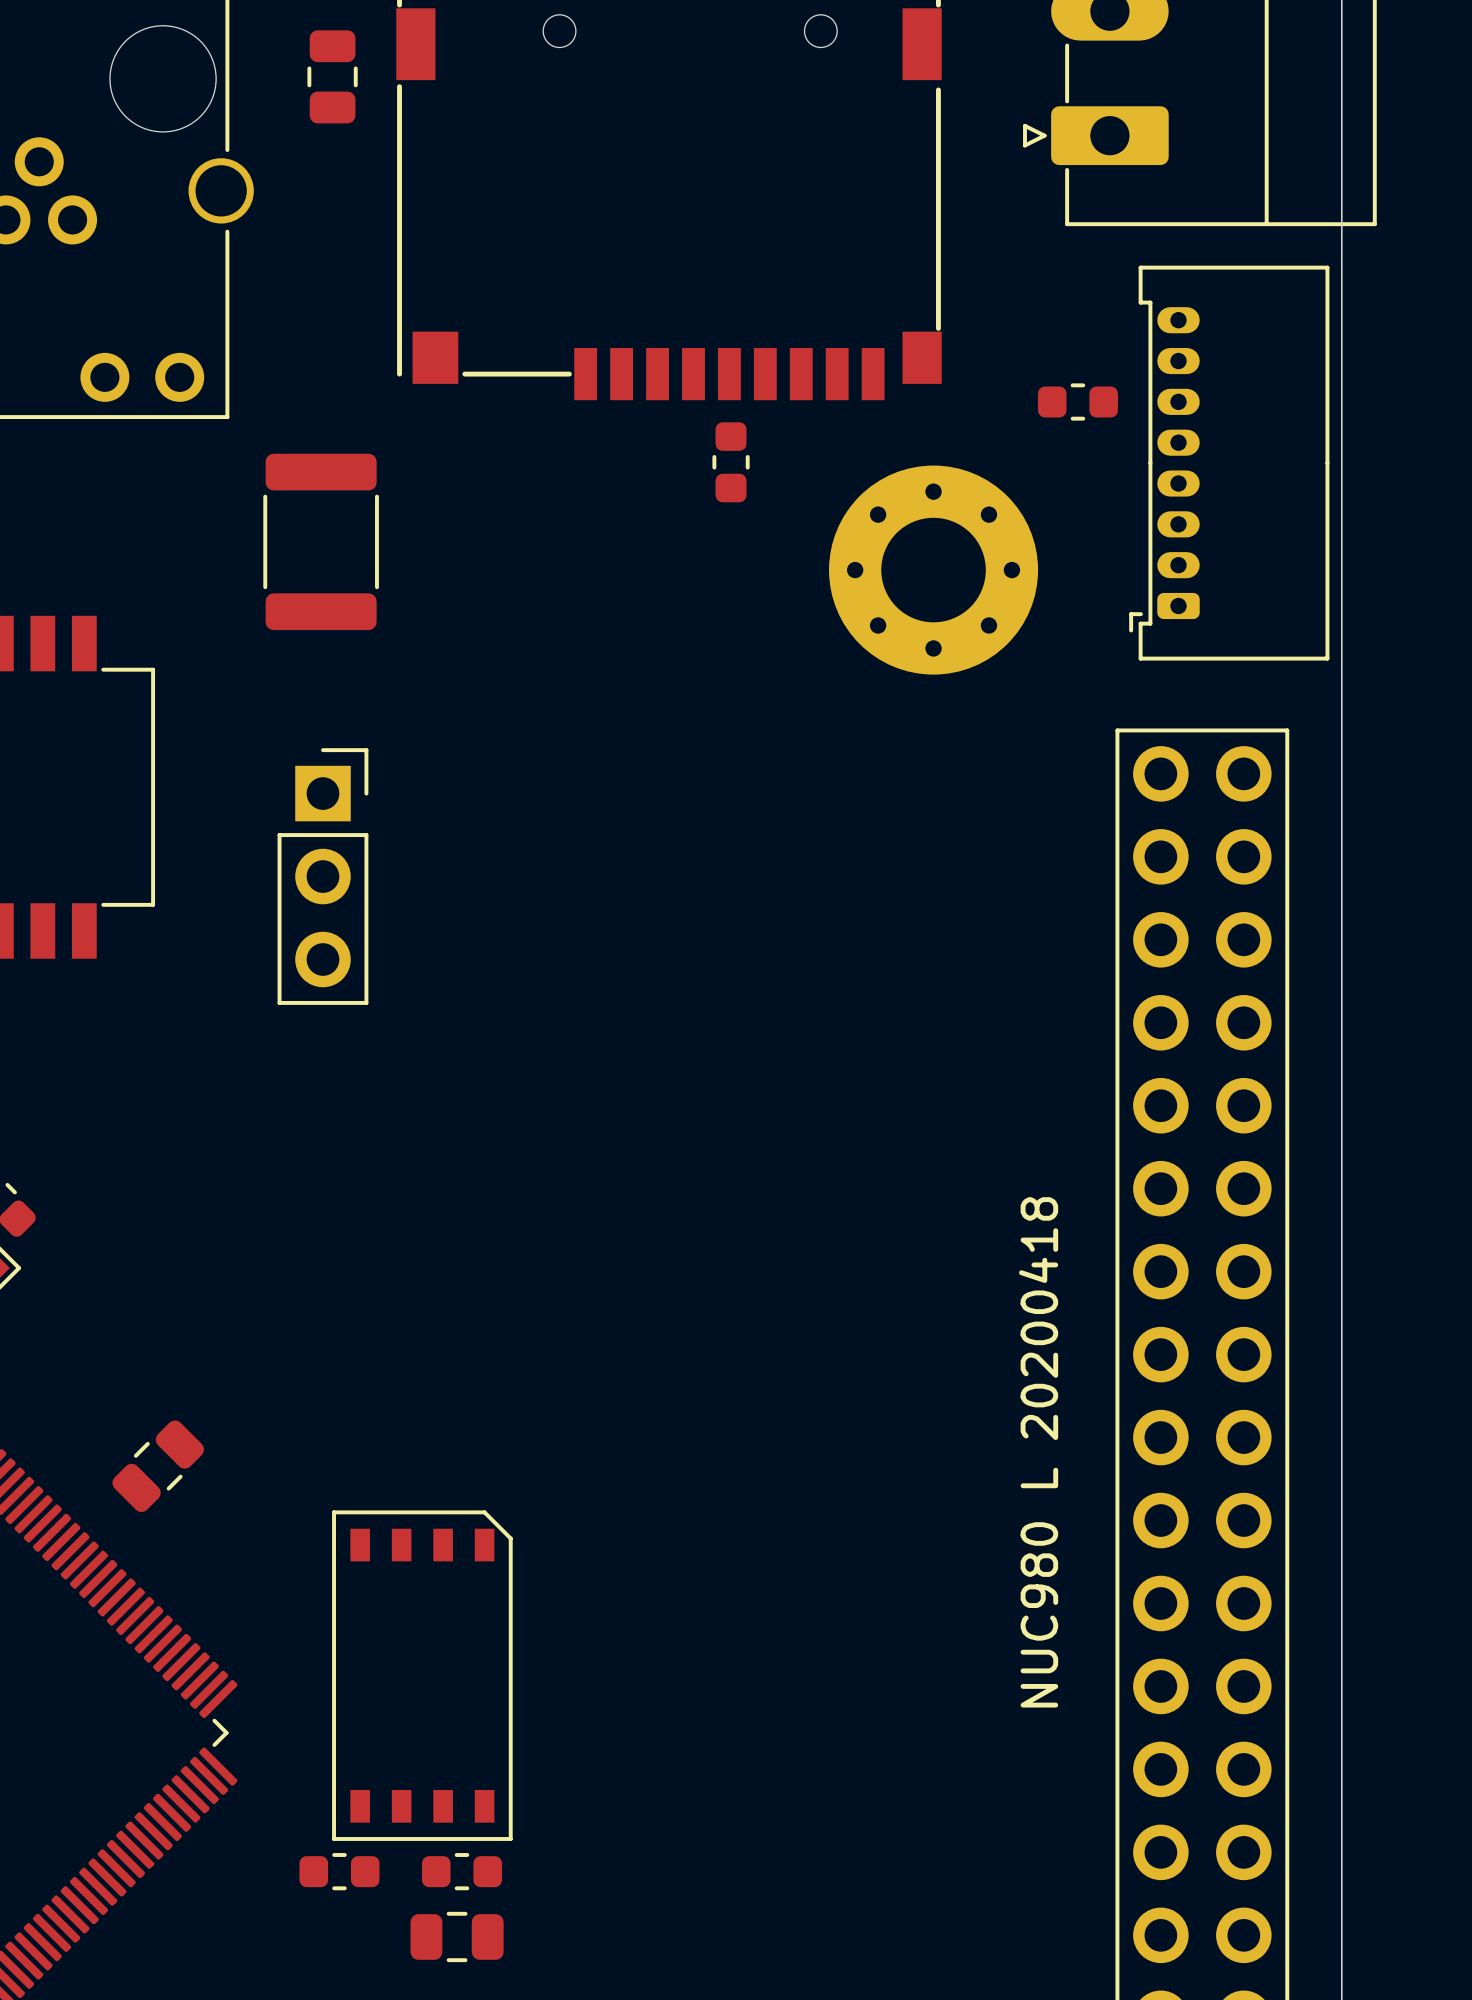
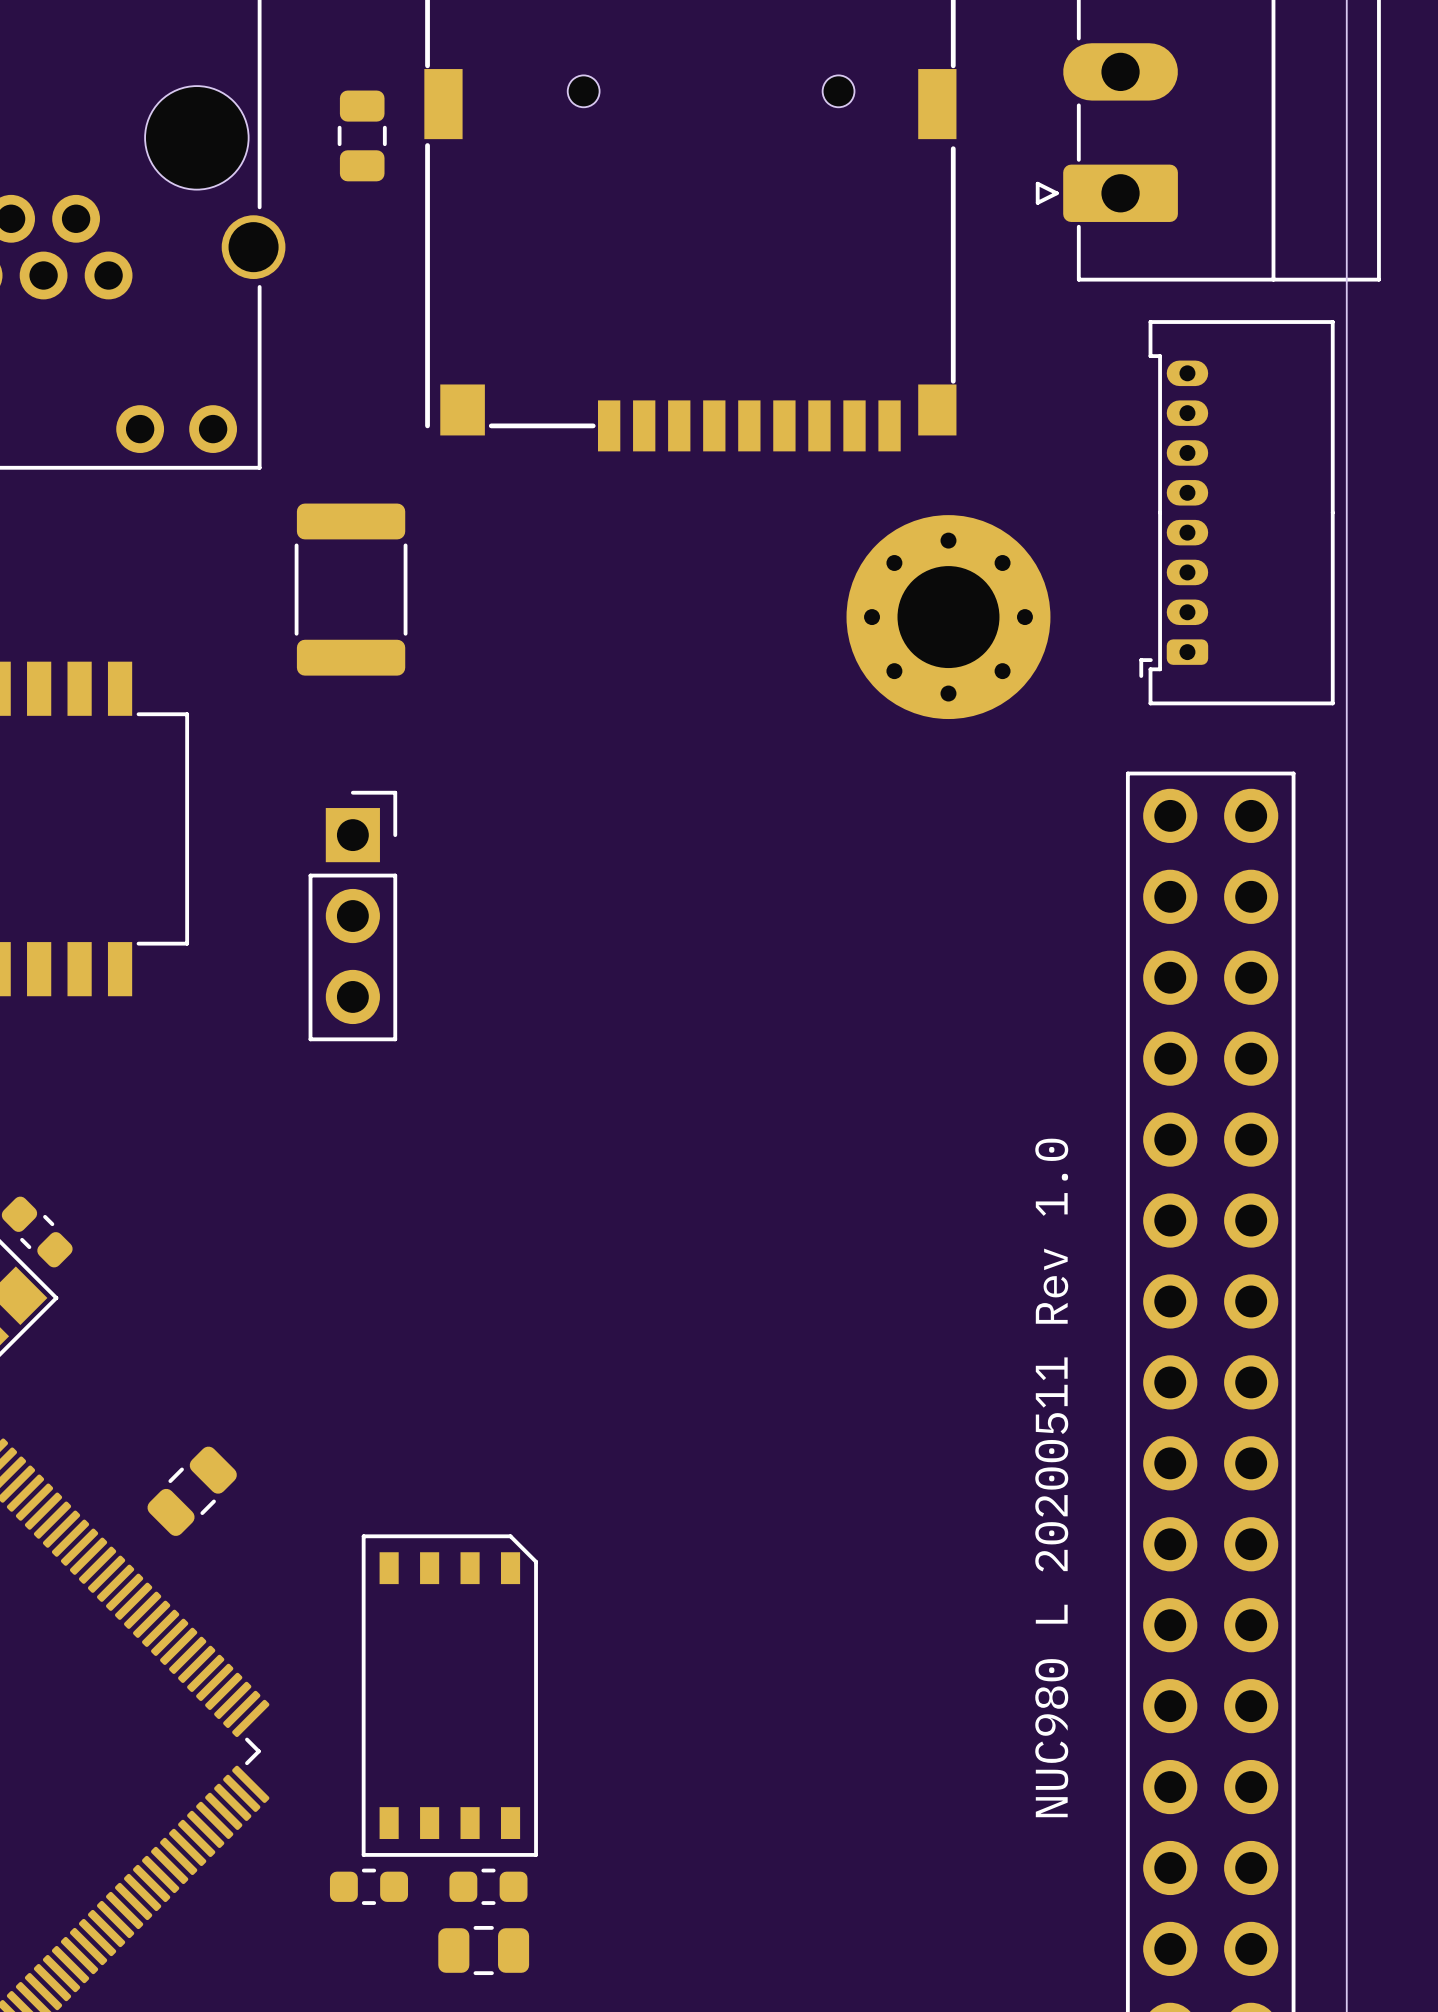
part: (1077, 402) -> none
part: (731, 462) -> none
text: NUC980 L 20200418 (1038, 1452) -> NUC980 L 20200511 Rev 1.0 (1051, 1477)

